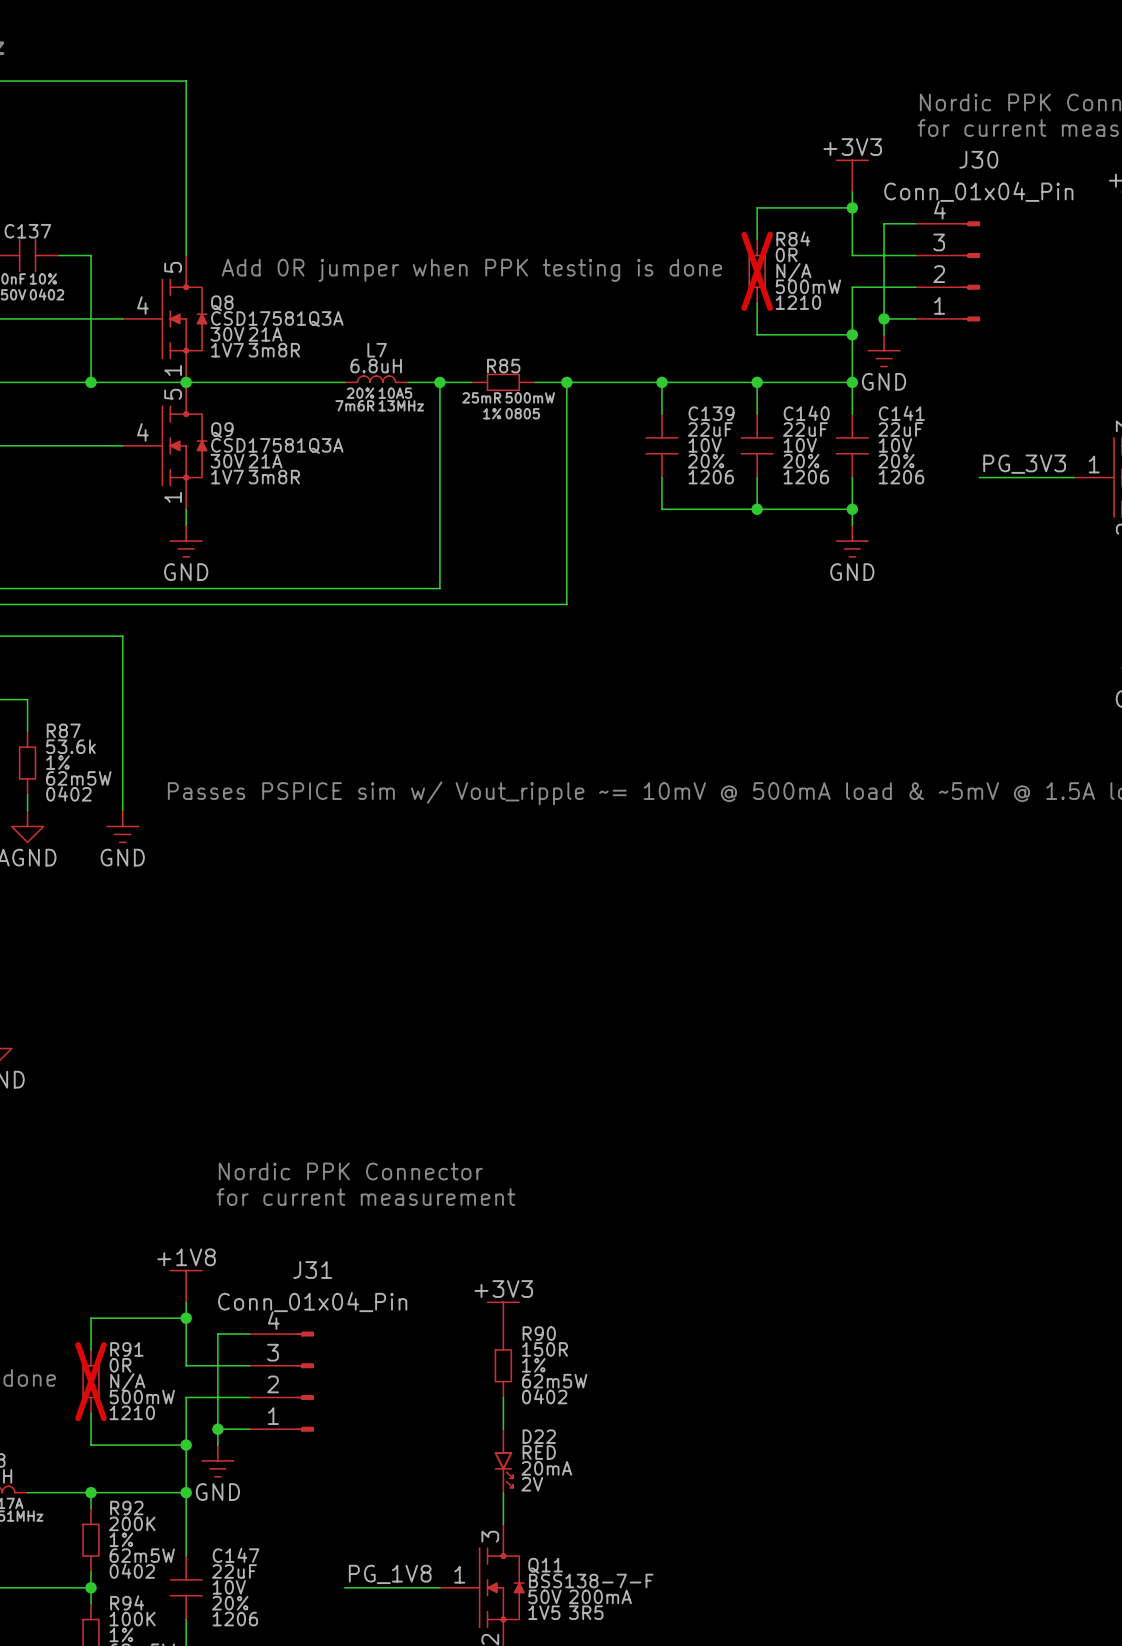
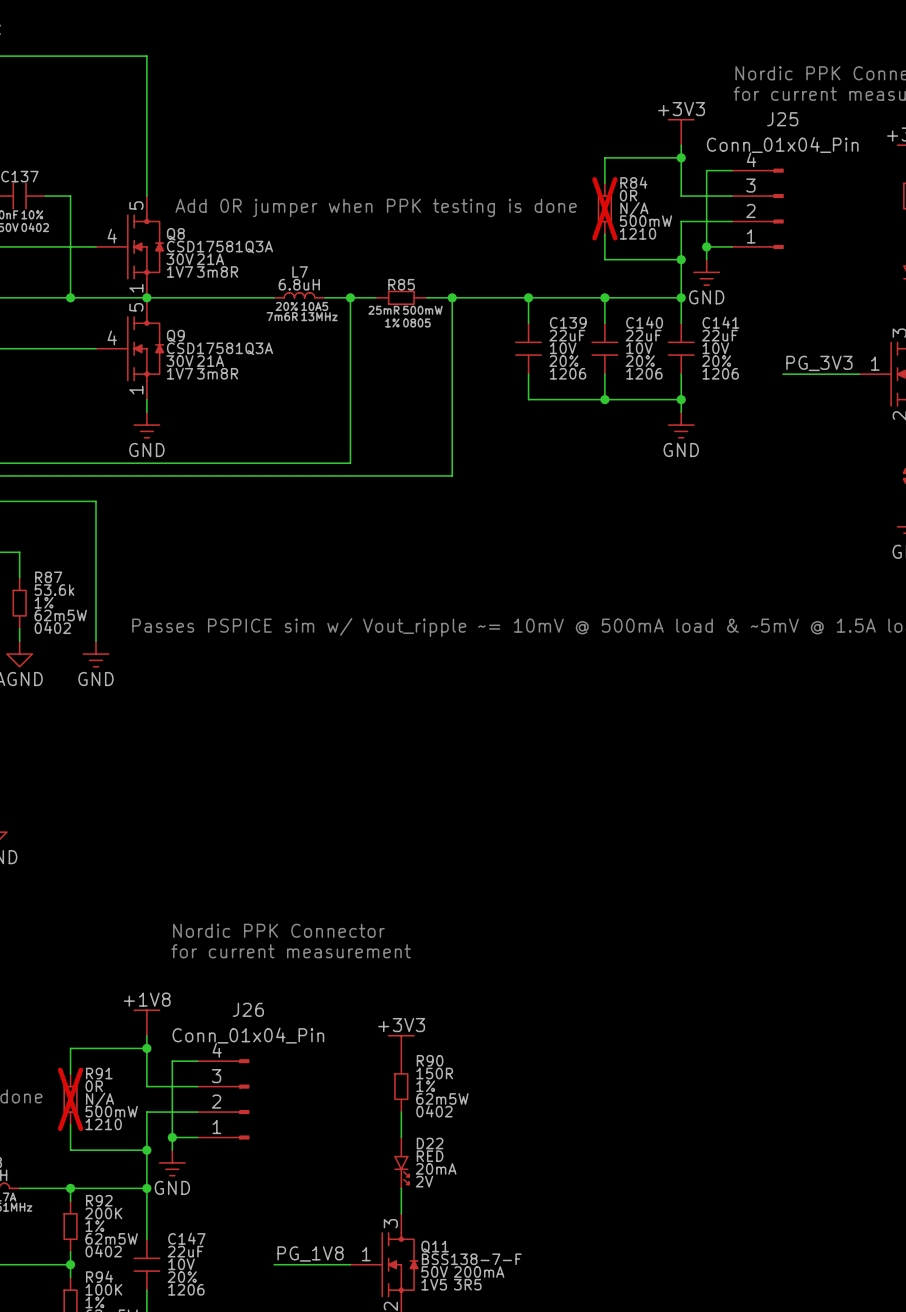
J30 name: J30 (978, 159) -> J25 (782, 119)
J31 name: J31 (312, 1270) -> J26 (248, 1009)

